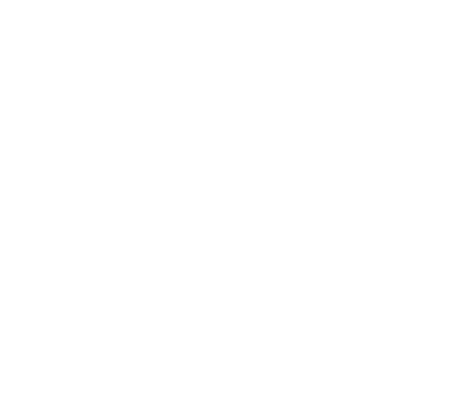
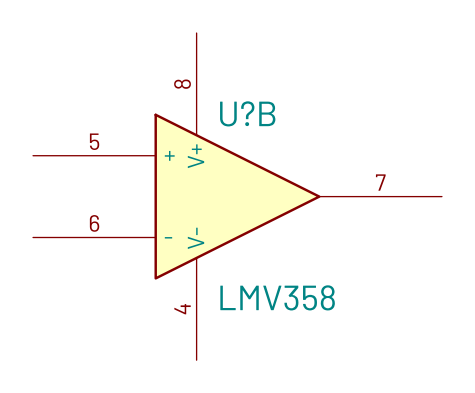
U?B: none -> LMV358 (237, 196)

